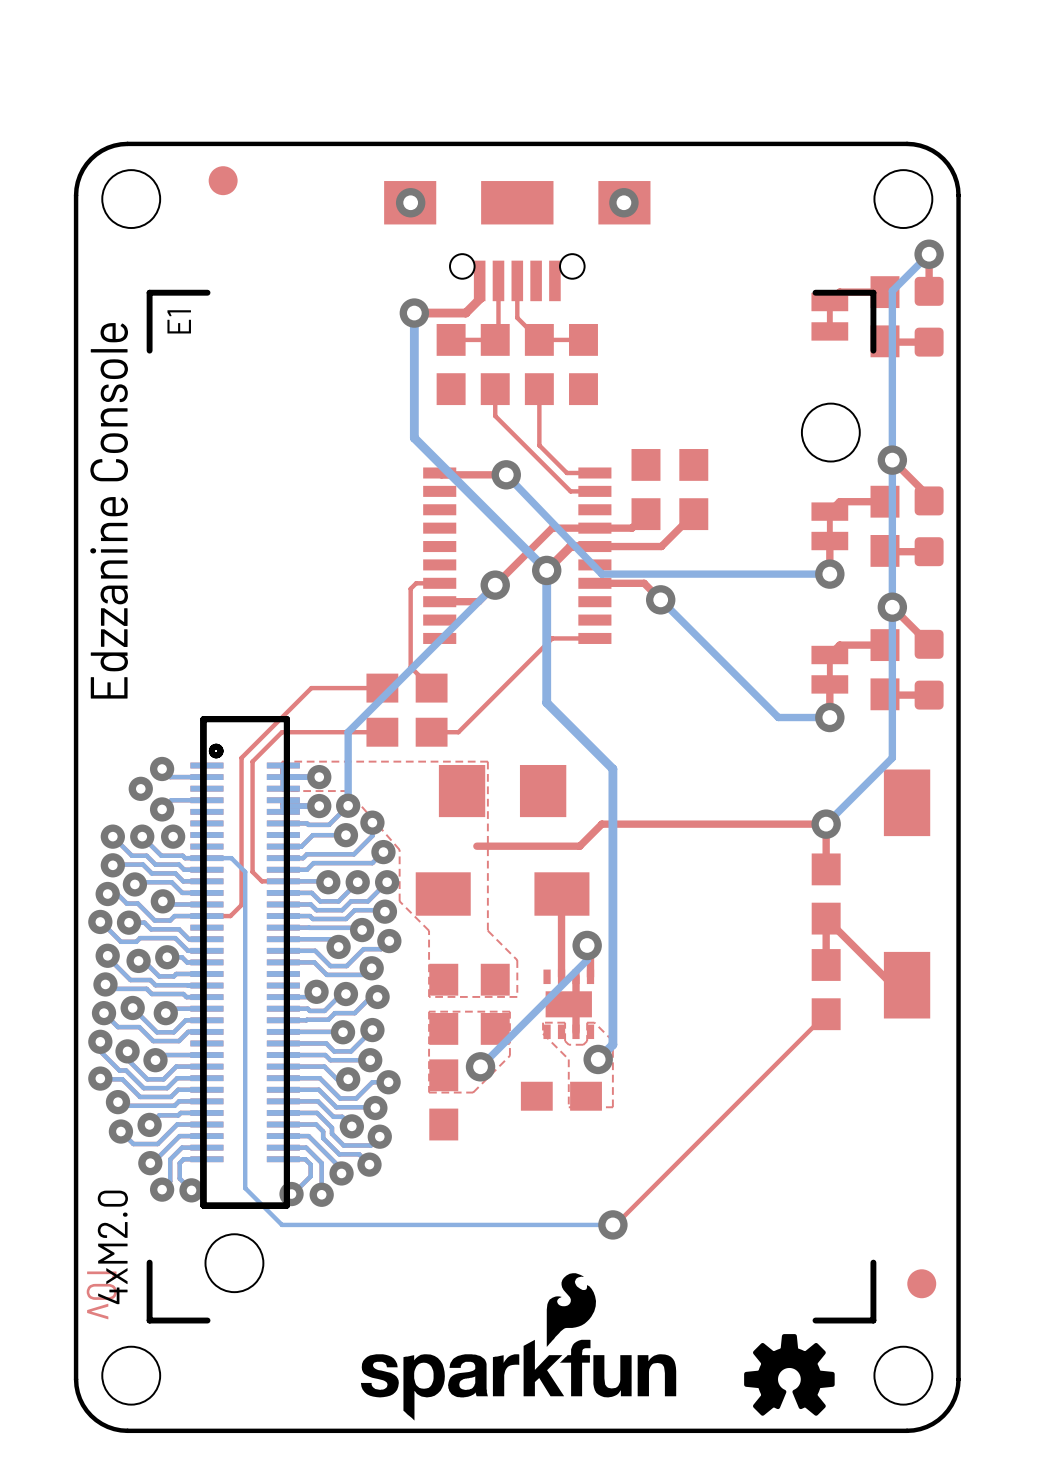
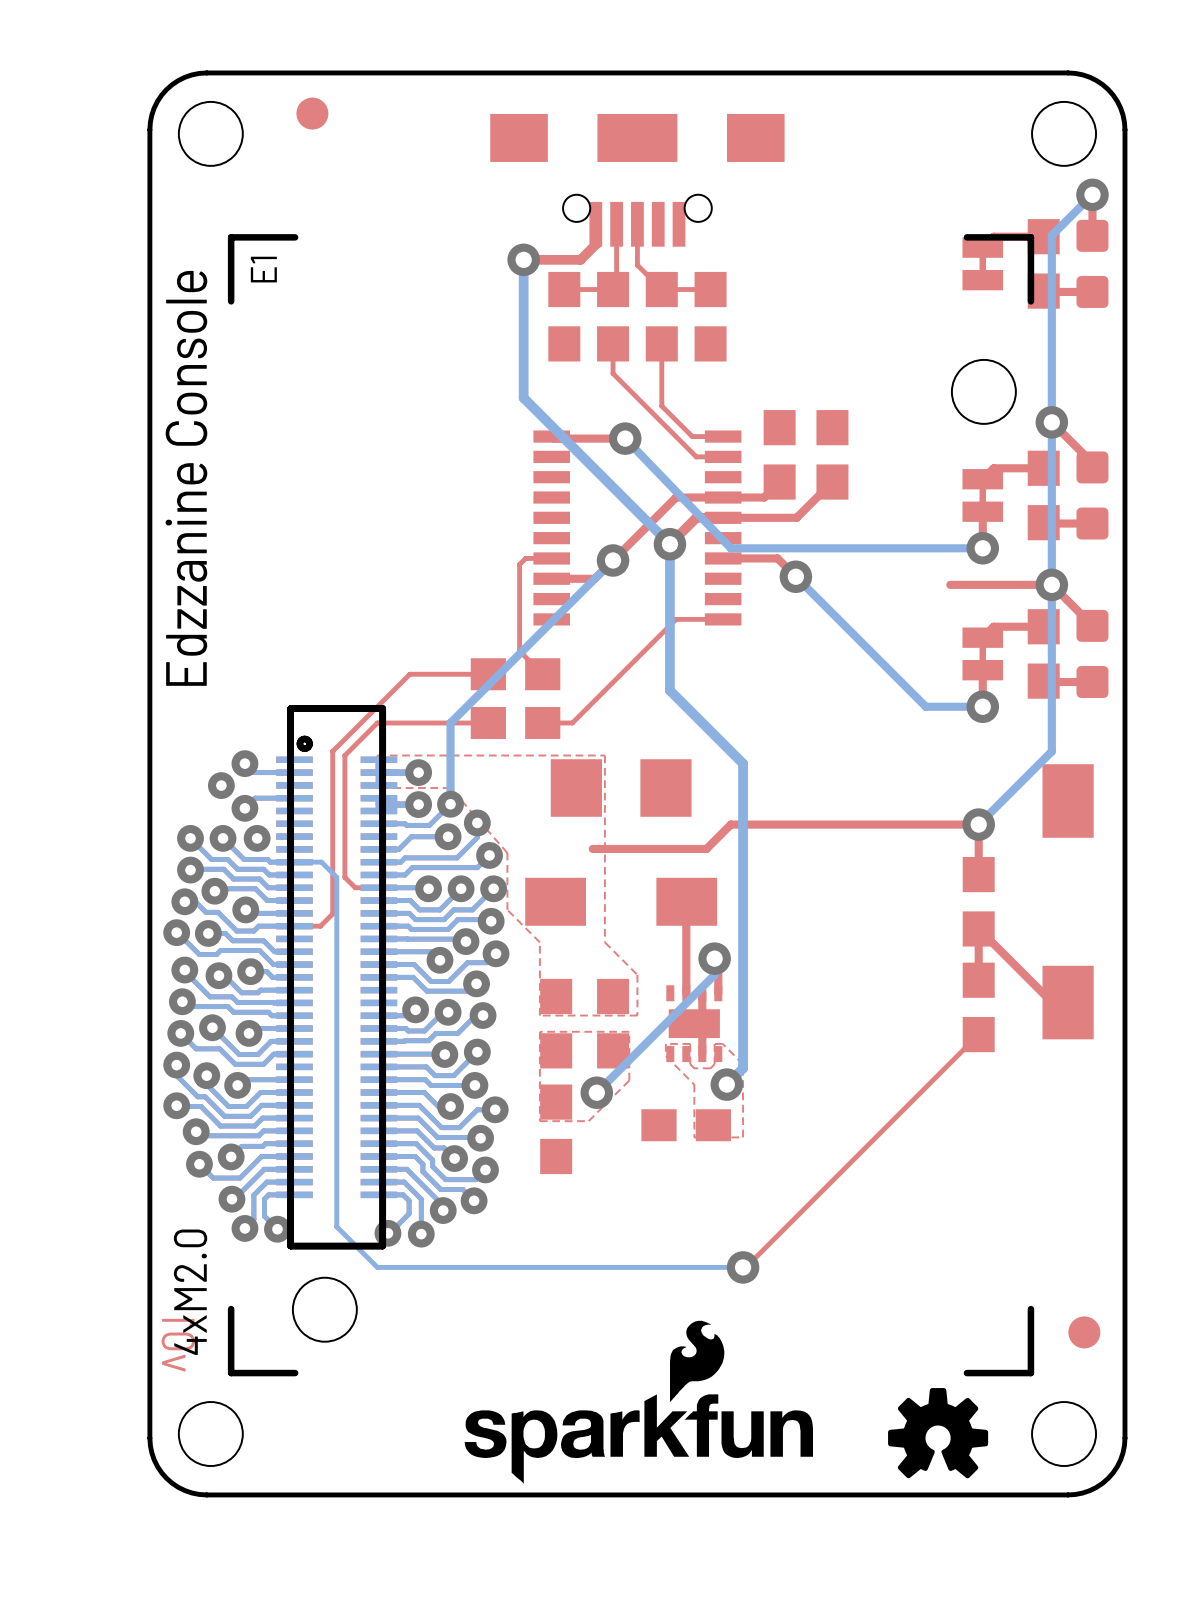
via: (410, 202) -> none
via: (623, 202) -> none
top track: none -> (1051, 584) (950, 584)

